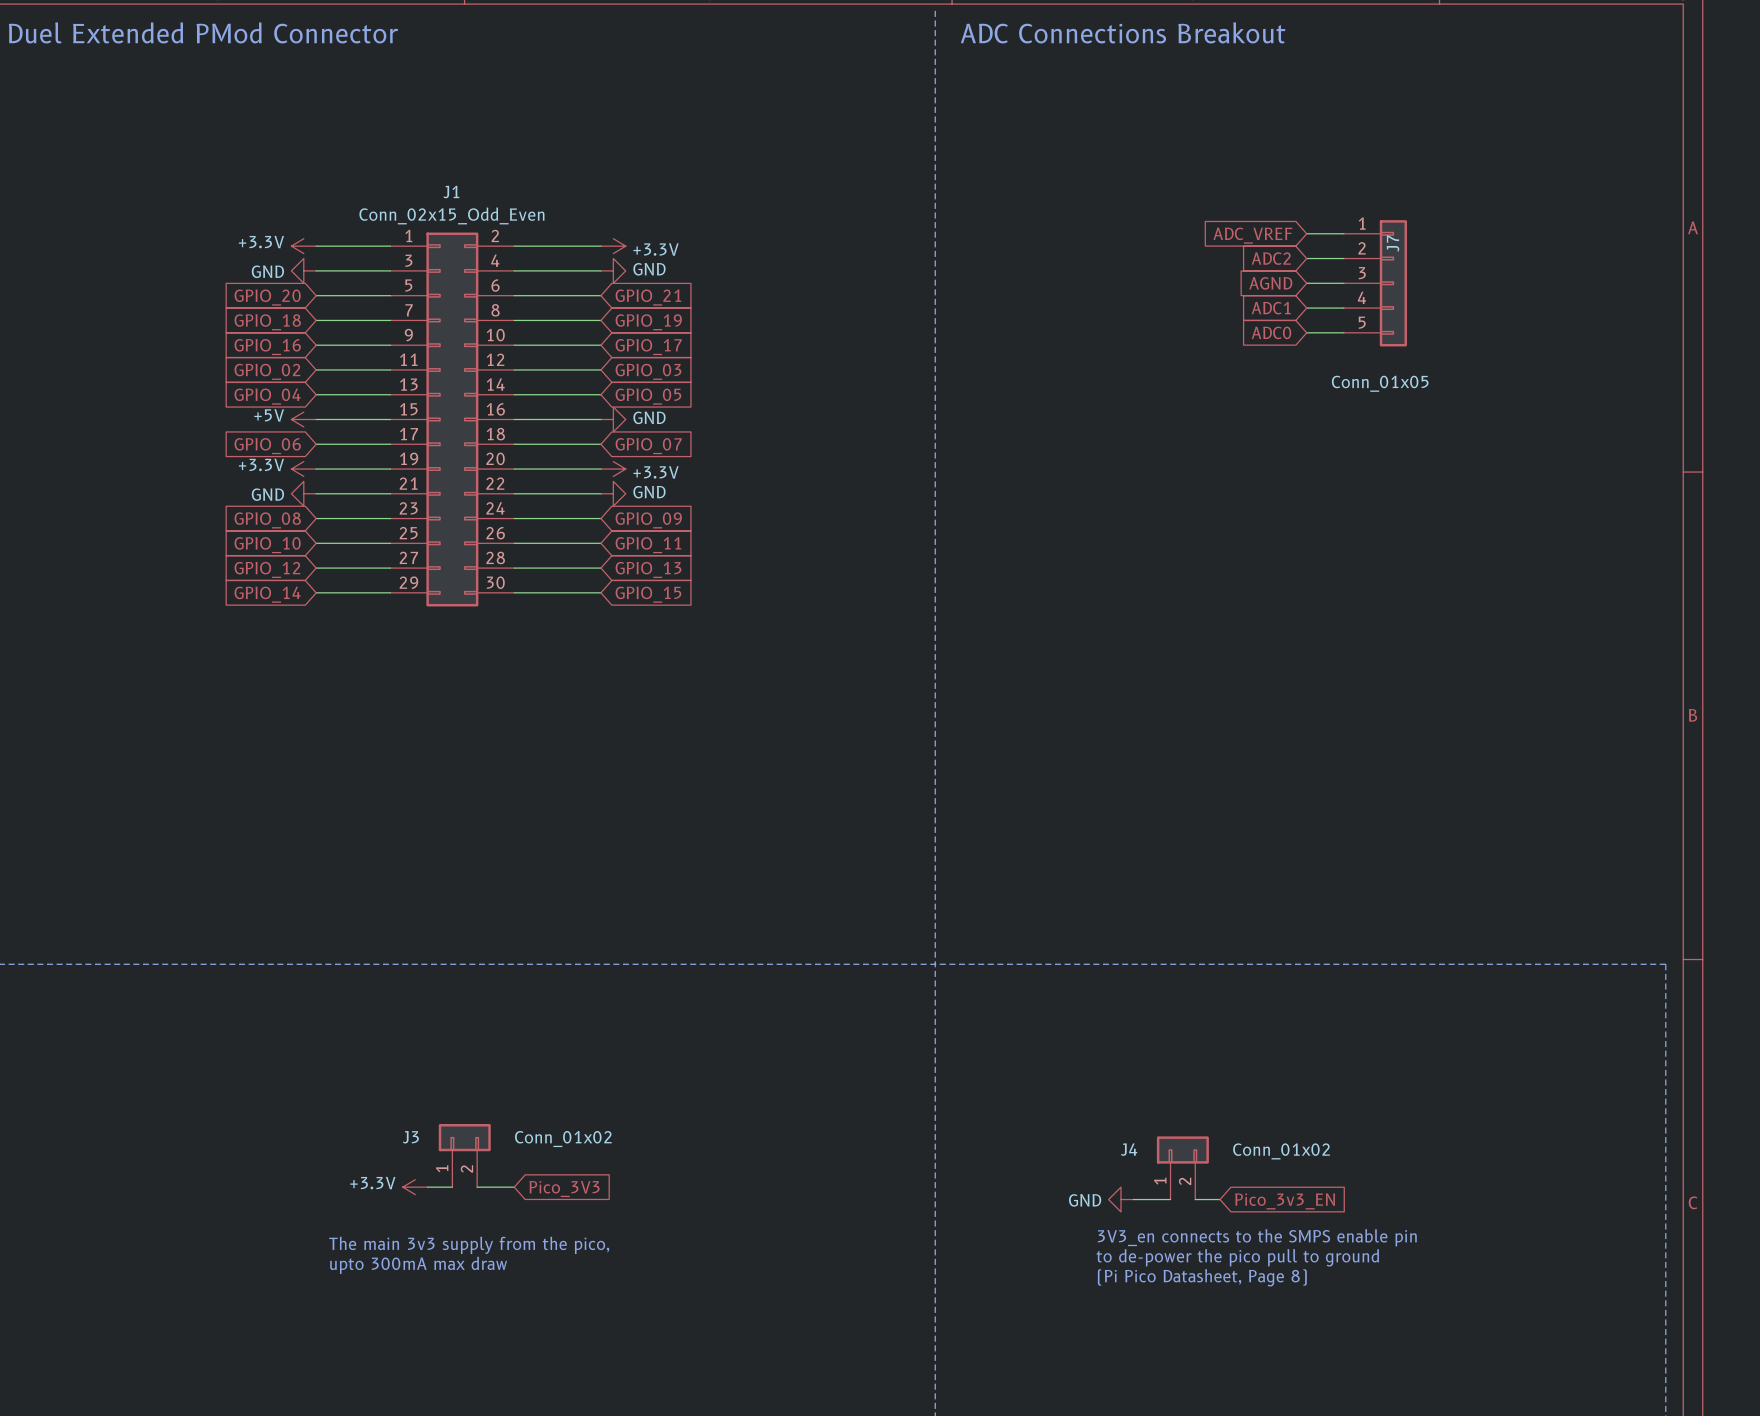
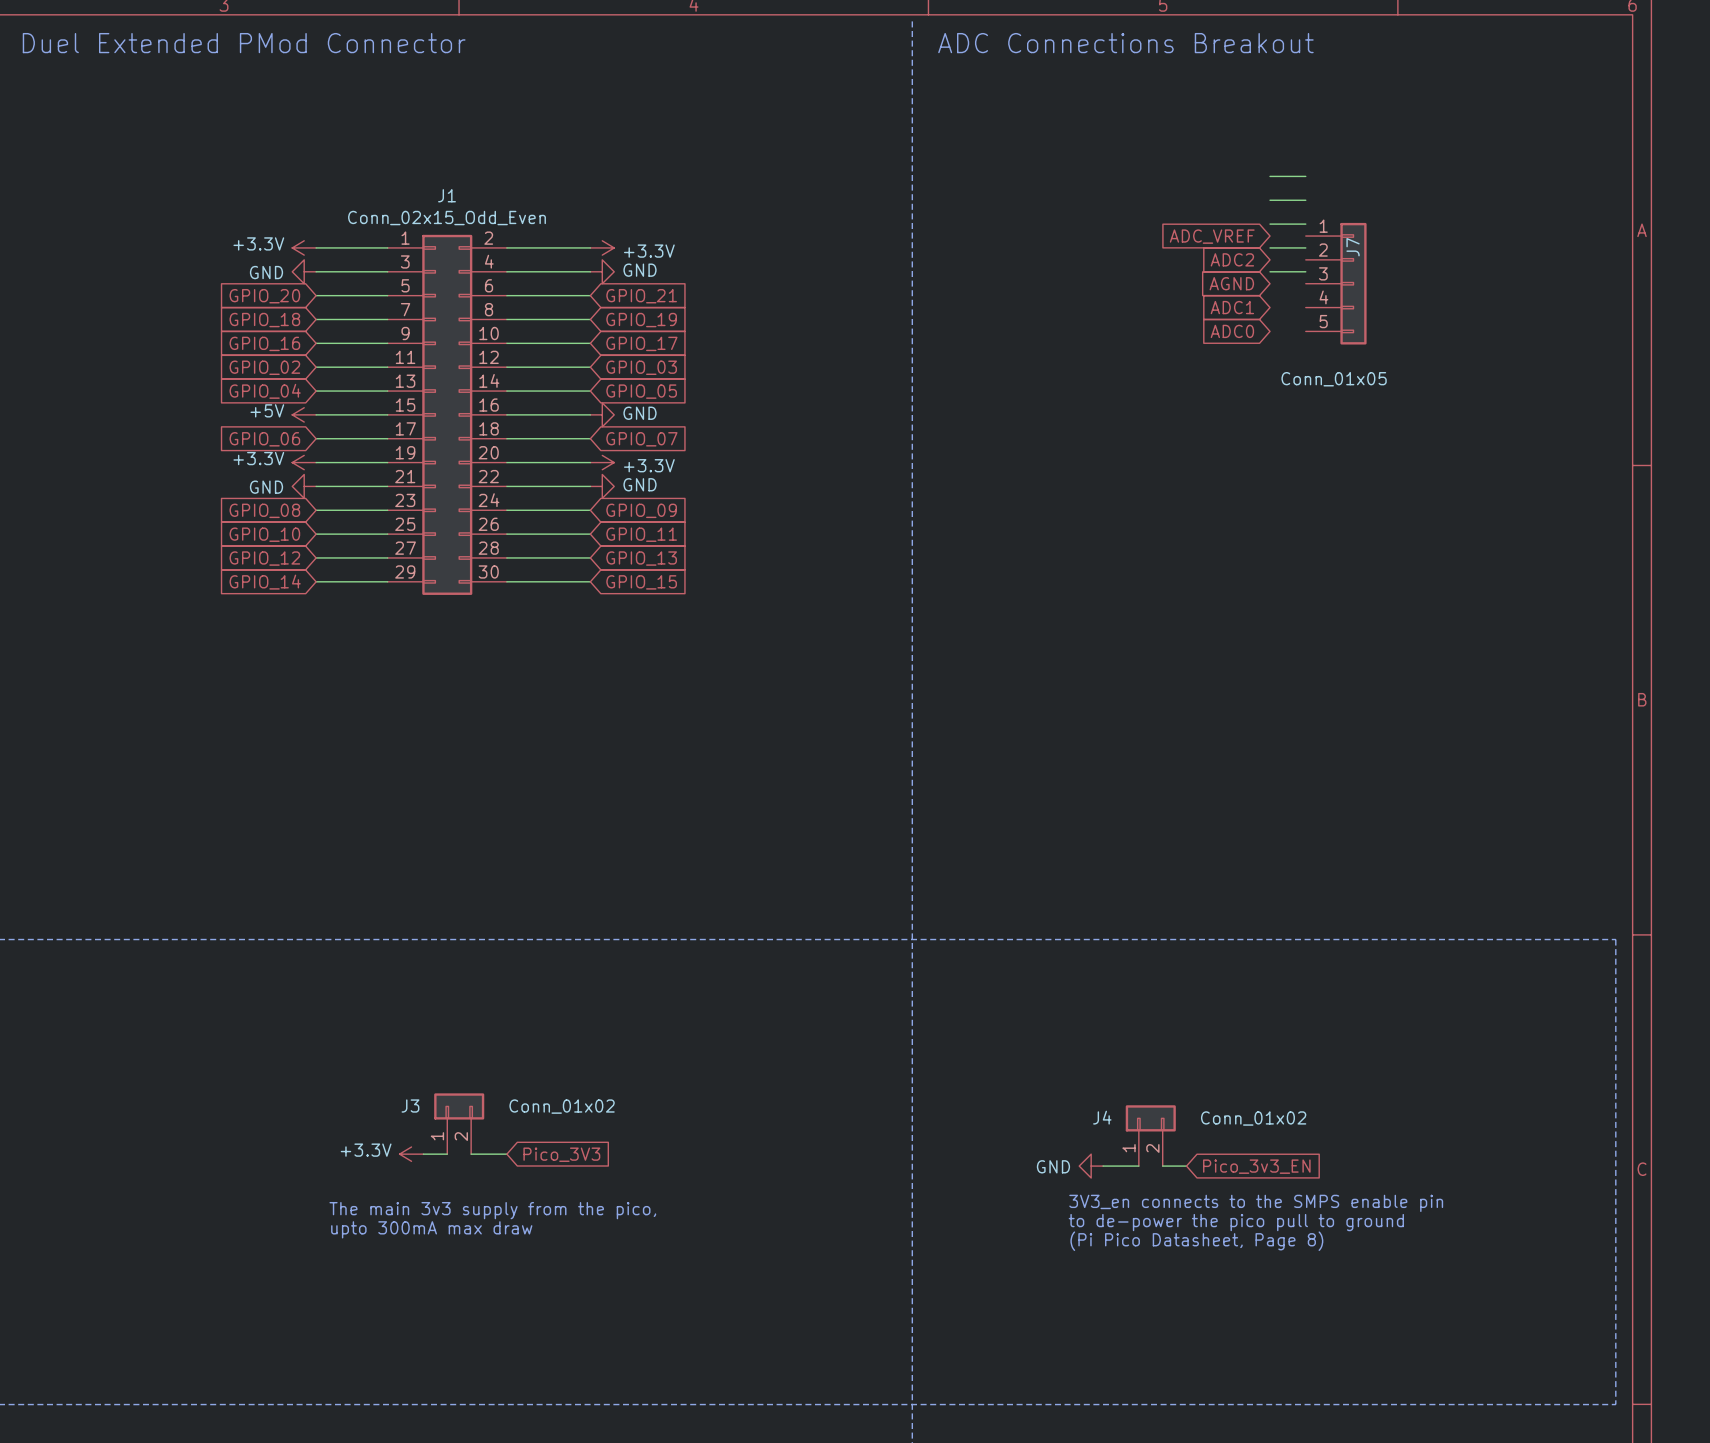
wire: (1306, 233) (1343, 233) -> (1270, 176) (1305, 176)
wire: (1306, 258) (1343, 258) -> (1270, 200) (1305, 200)
wire: (1306, 283) (1343, 283) -> (1270, 224) (1305, 224)
wire: (1306, 308) (1343, 308) -> (1270, 247) (1305, 247)
wire: (1306, 332) (1343, 332) -> (1270, 271) (1305, 271)

